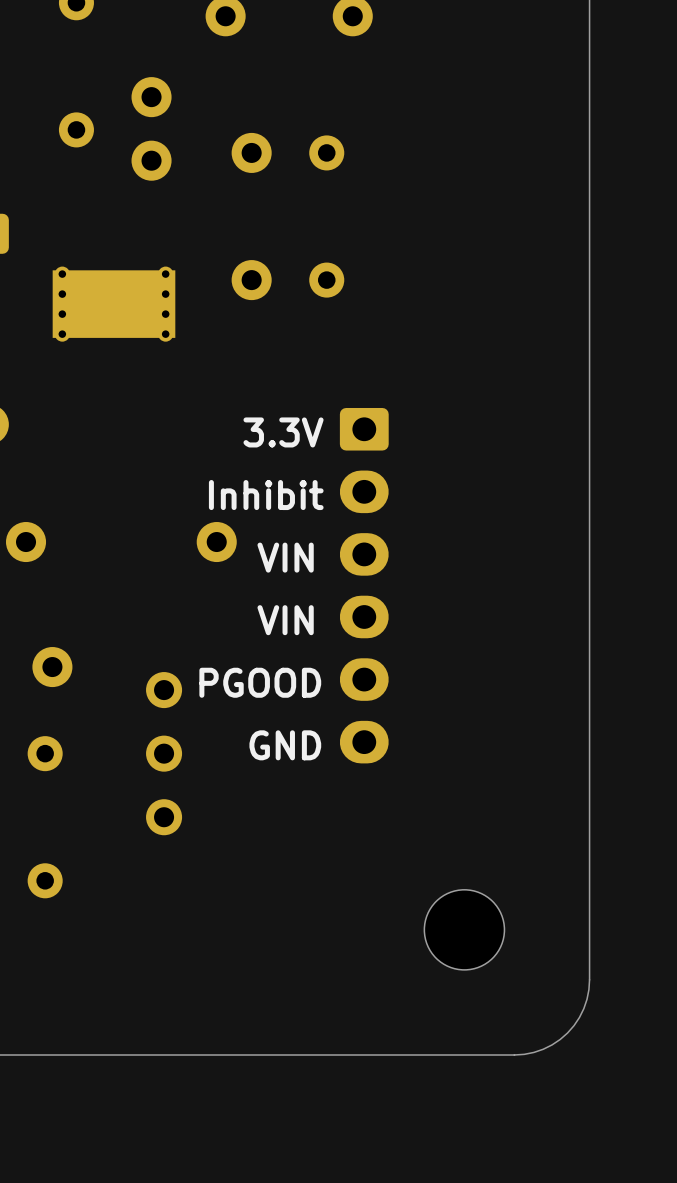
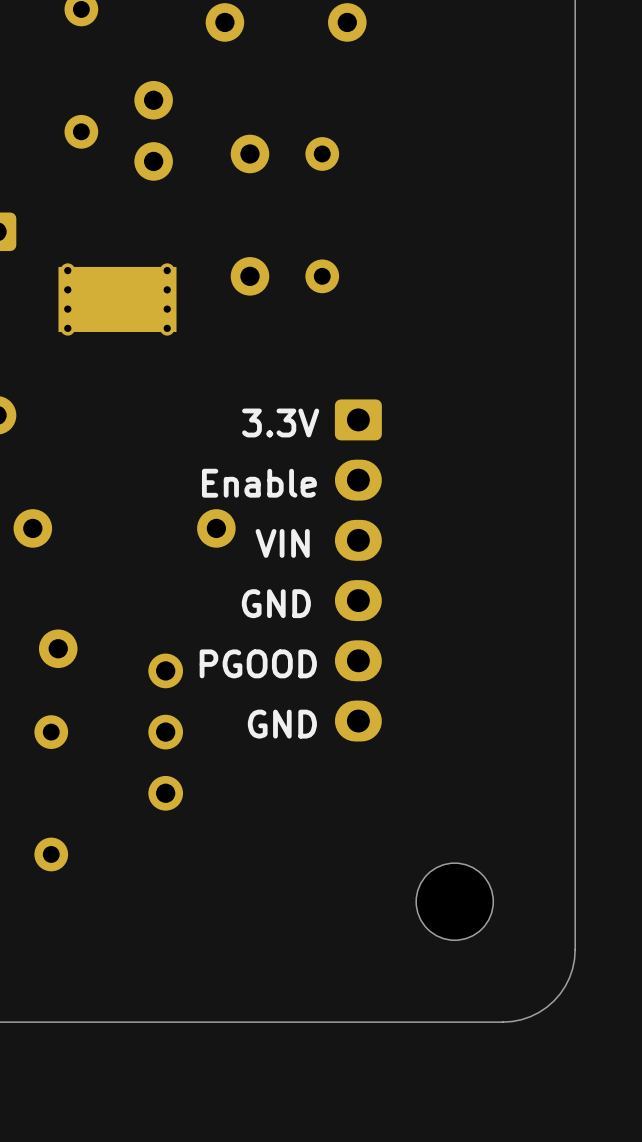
text: Inhibit (266, 495) -> Enable (259, 483)
text: VIN (285, 620) -> GND (276, 603)

